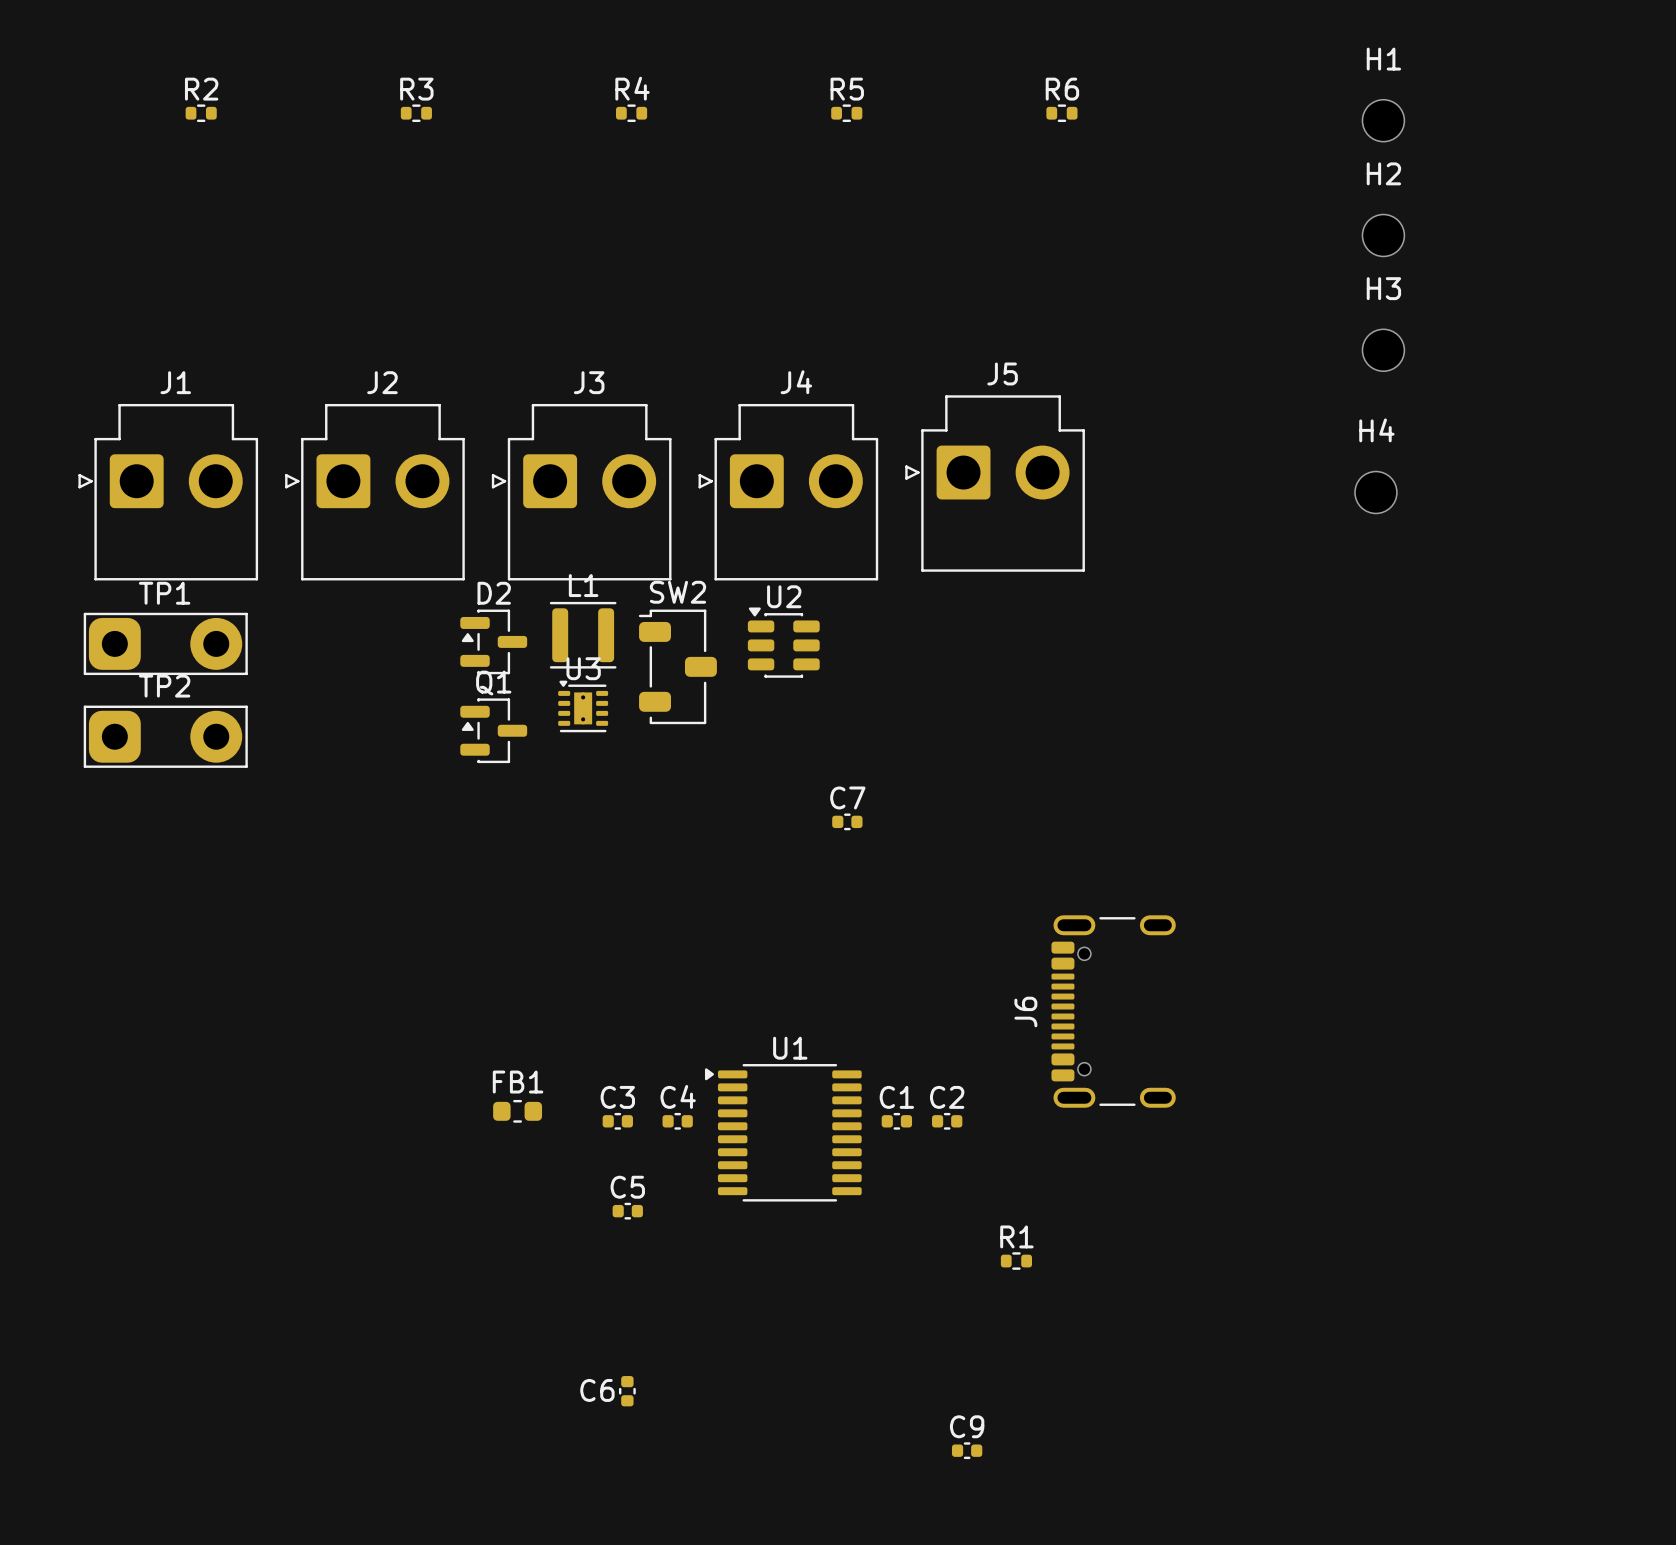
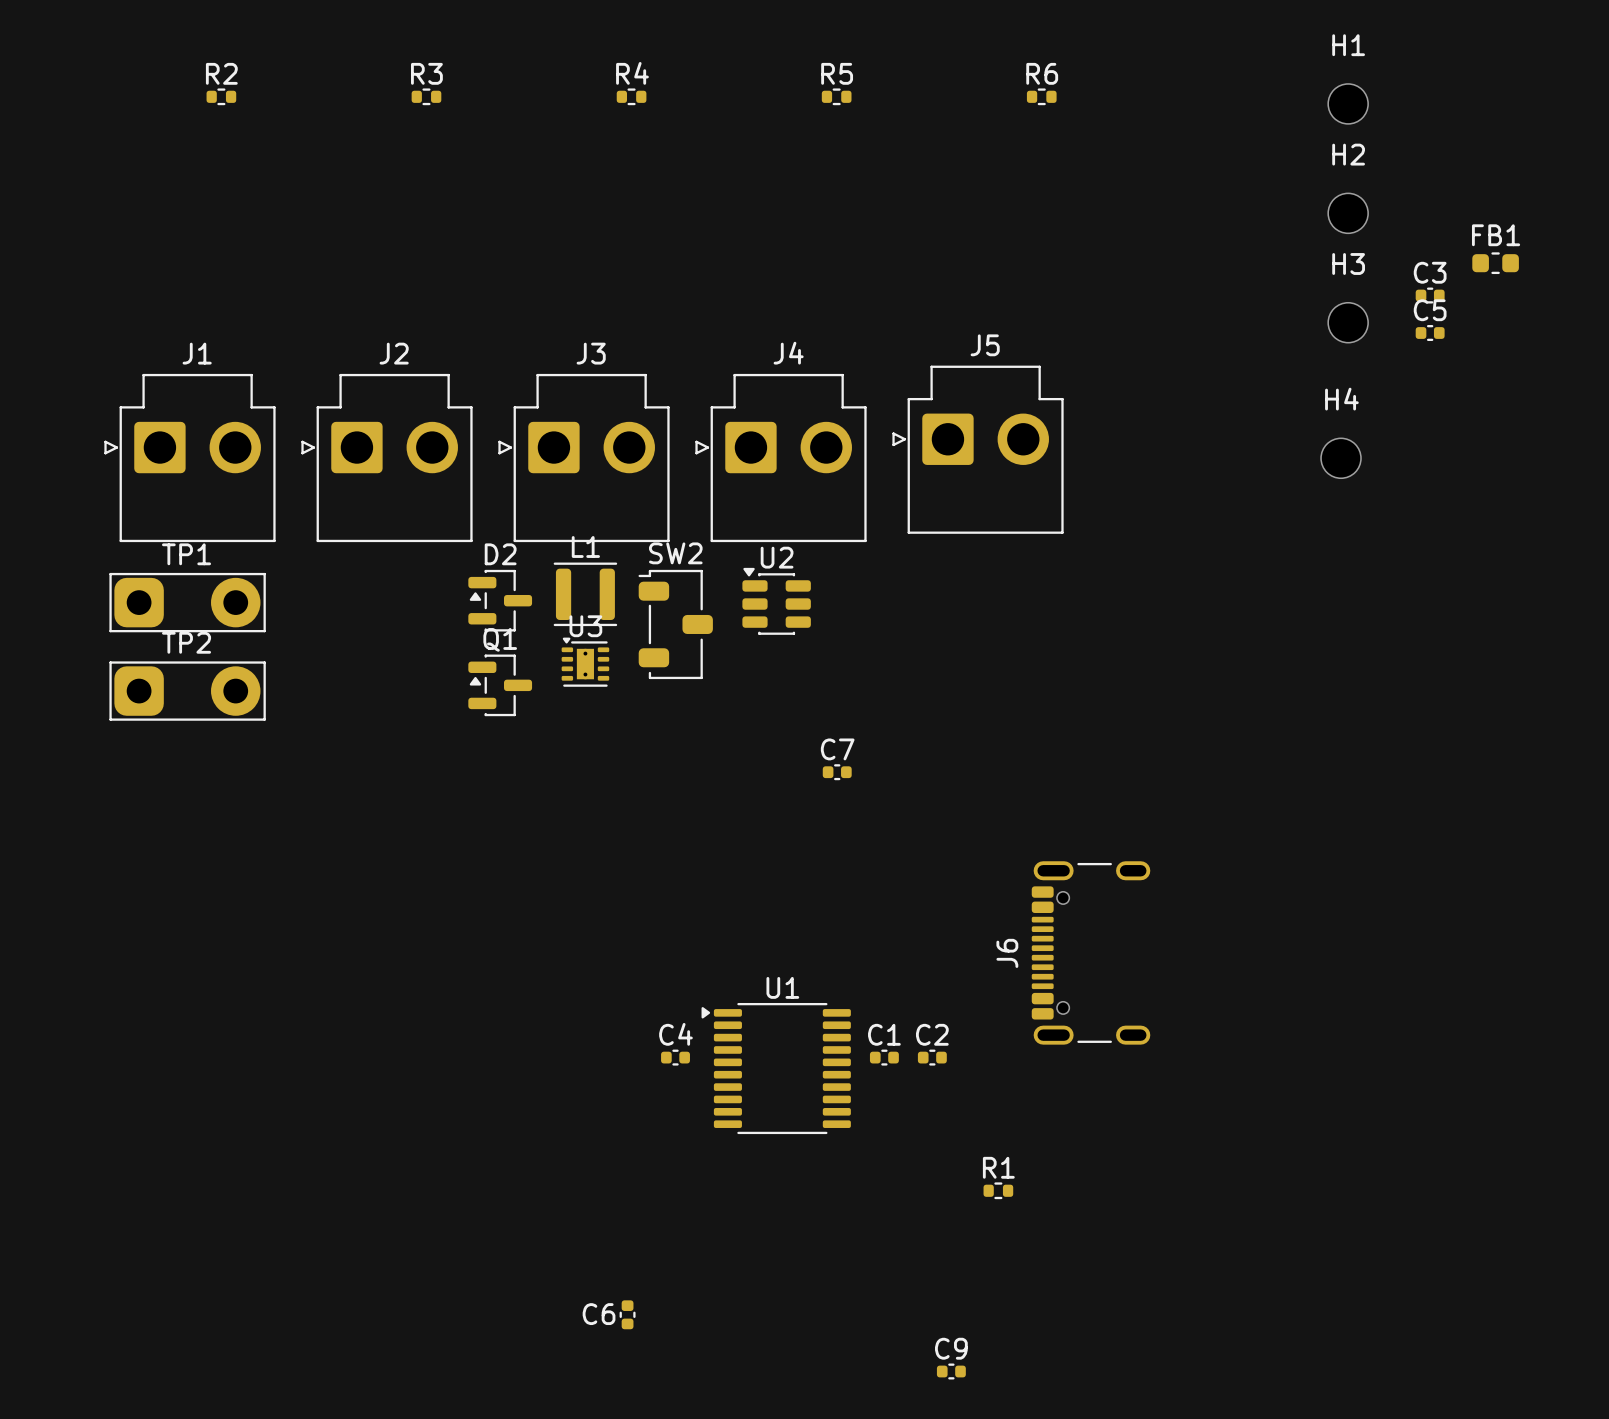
FB1 position: (517, 1111) -> (1495, 263)
C3 position: (617, 1121) -> (1430, 295)
C5 position: (627, 1211) -> (1430, 333)

